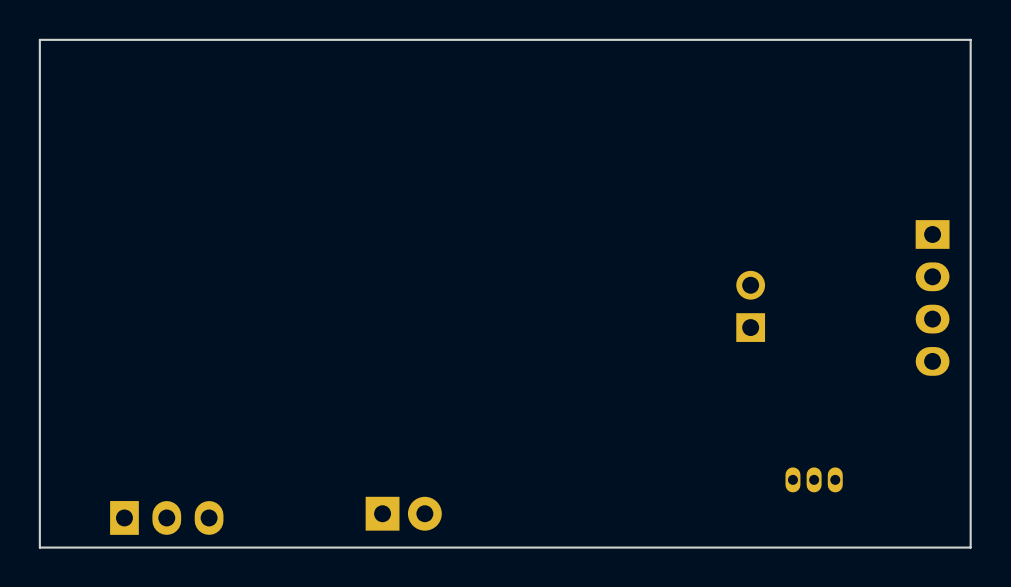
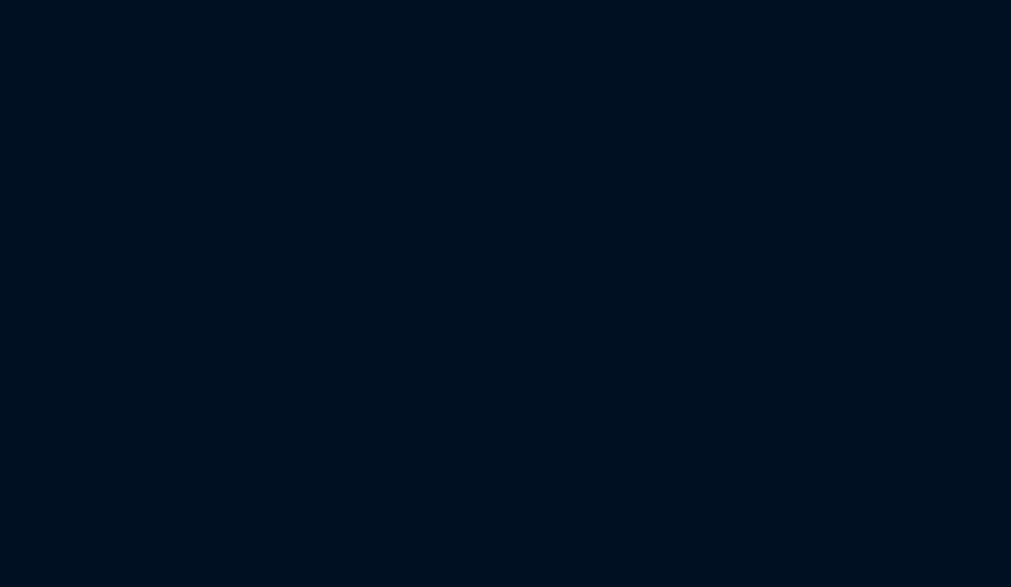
board edge: (970, 39) (970, 547) (39, 547) (39, 39) (970, 39) -> none
part: (932, 297) -> none
part: (750, 306) -> none
part: (814, 479) -> none
part: (403, 513) -> none
part: (166, 517) -> none

